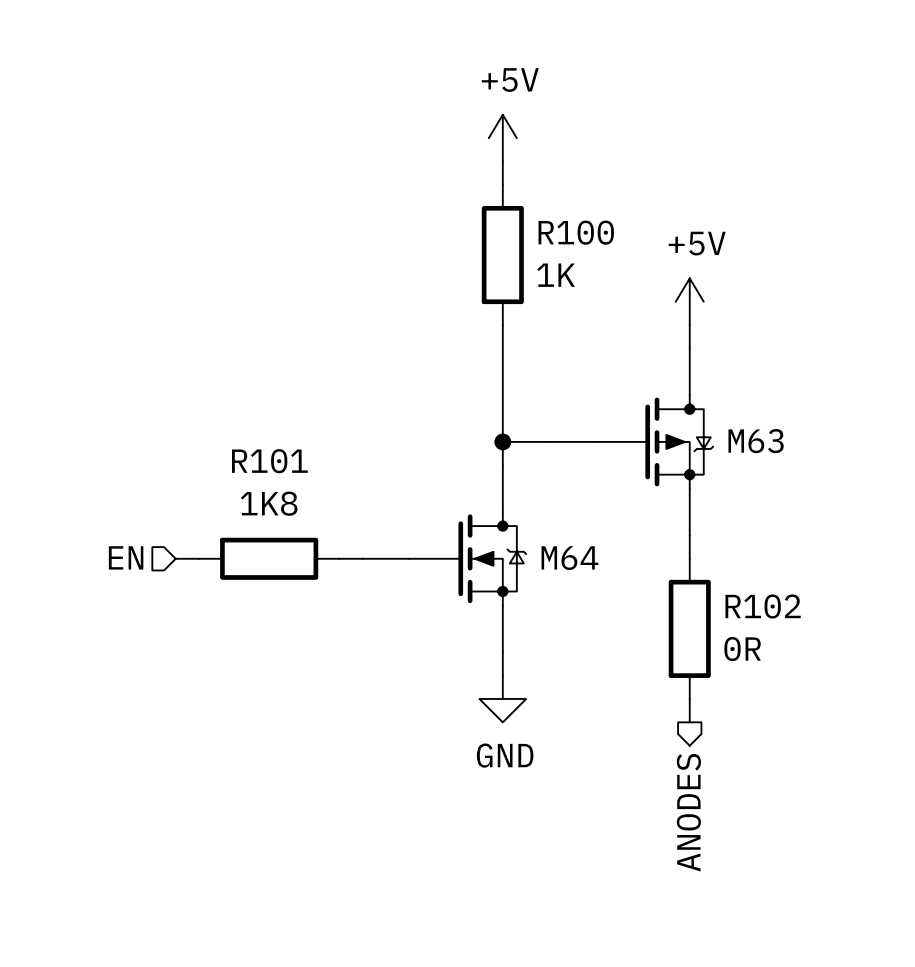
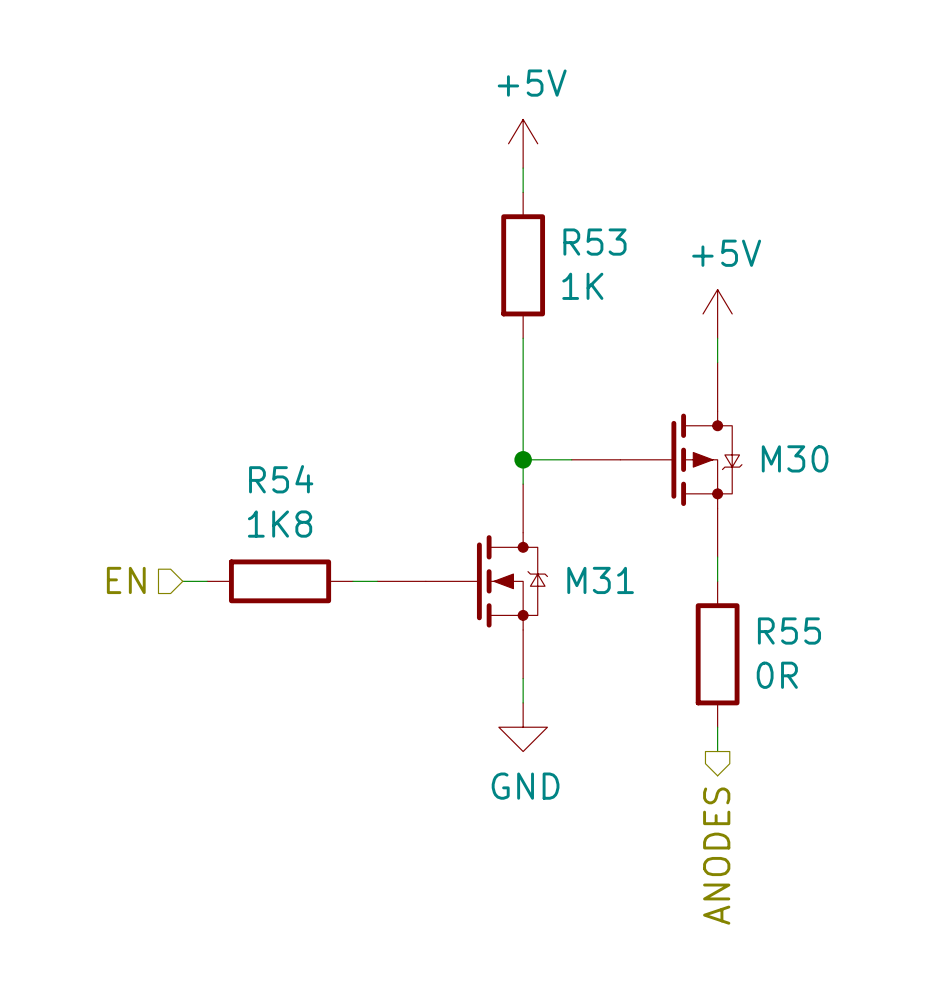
R100 name: R100 (576, 232) -> R53 (594, 242)
M63 name: M63 (756, 441) -> M30 (795, 458)
R101 name: R101 (269, 461) -> R54 (281, 479)
M64 name: M64 (569, 558) -> M31 (600, 580)
R102 name: R102 (763, 606) -> R55 (789, 631)

